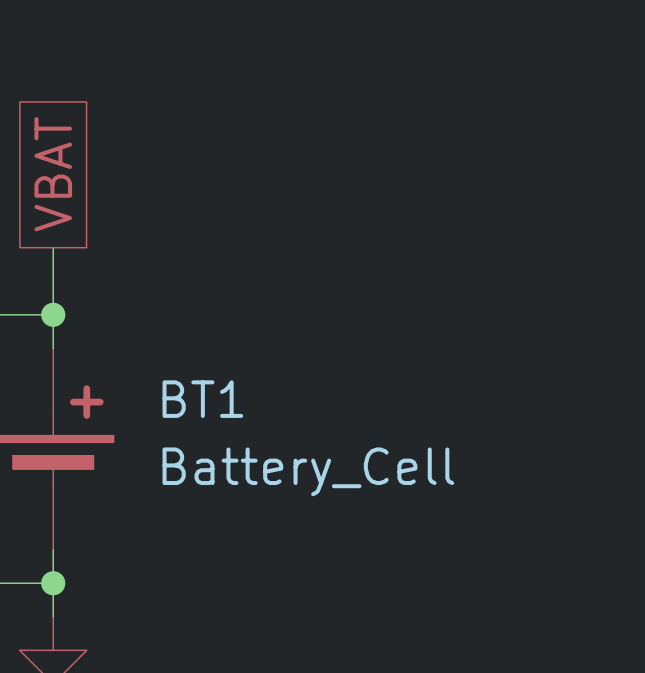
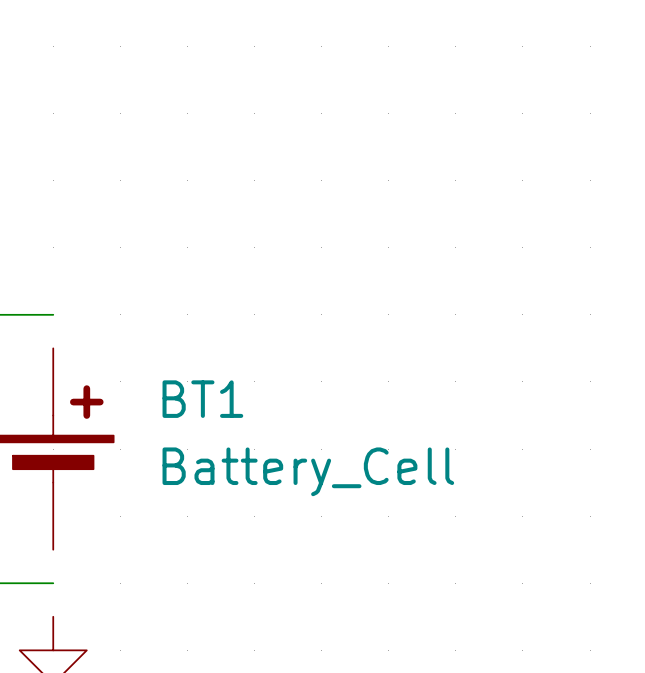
global label: VBAT (53, 174) -> none
wire: (53, 247) (53, 348) -> none
junction: (53, 314) -> none
wire: (53, 549) (53, 616) -> none
junction: (53, 583) -> none

